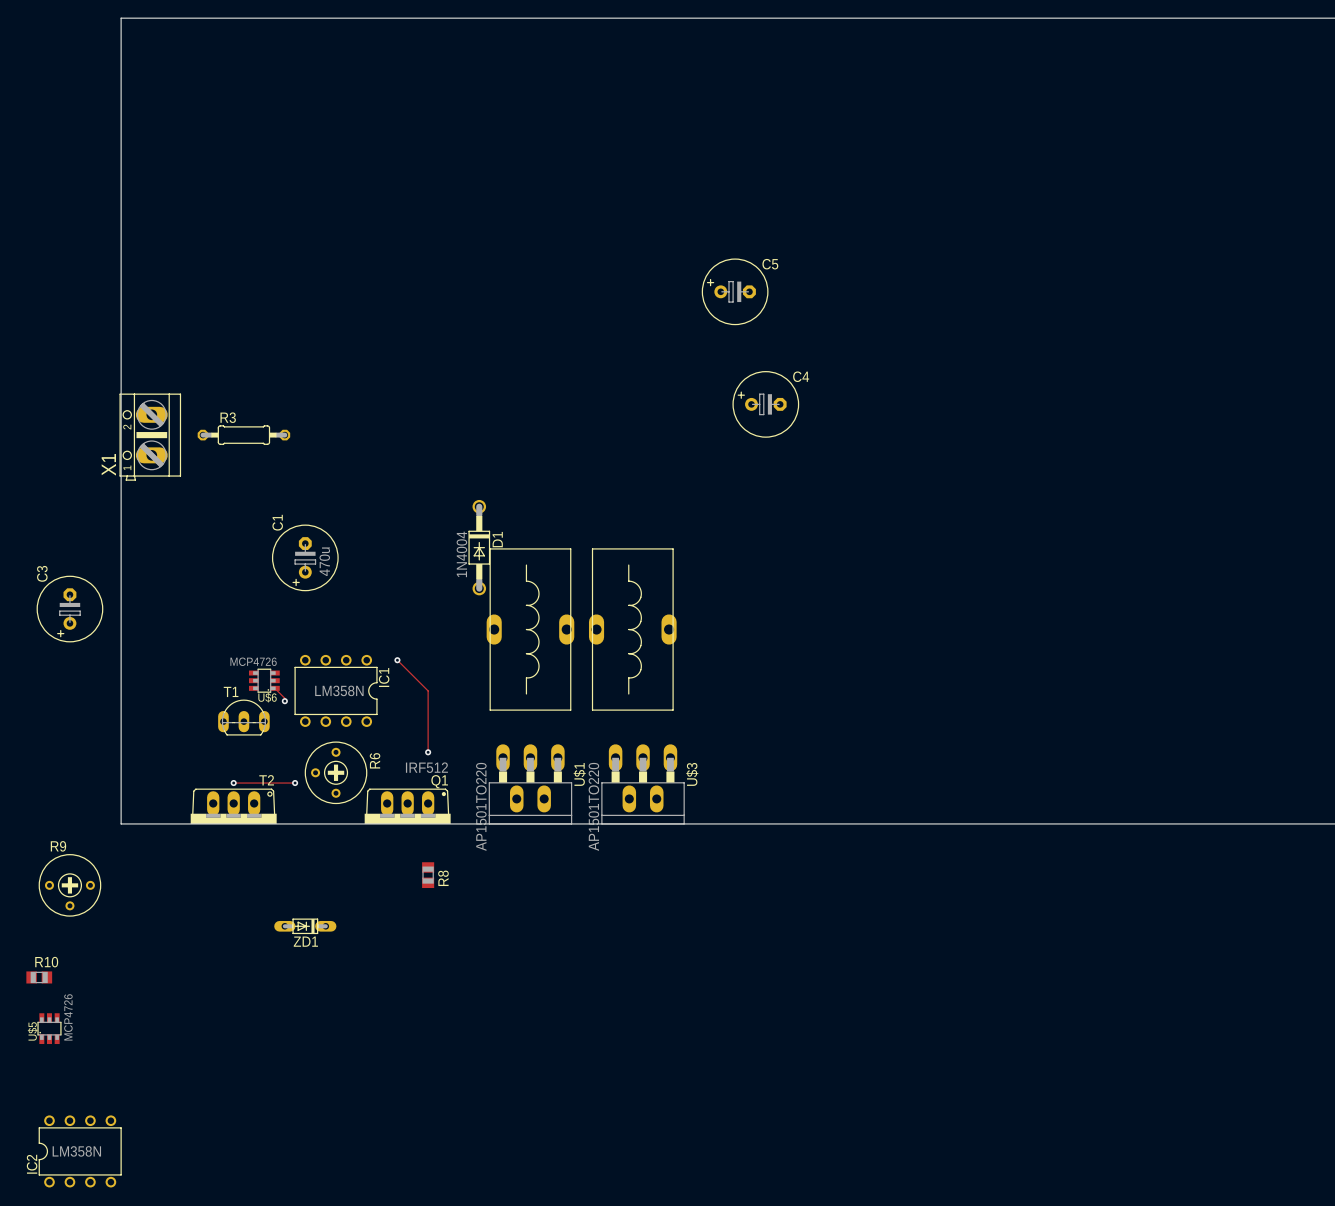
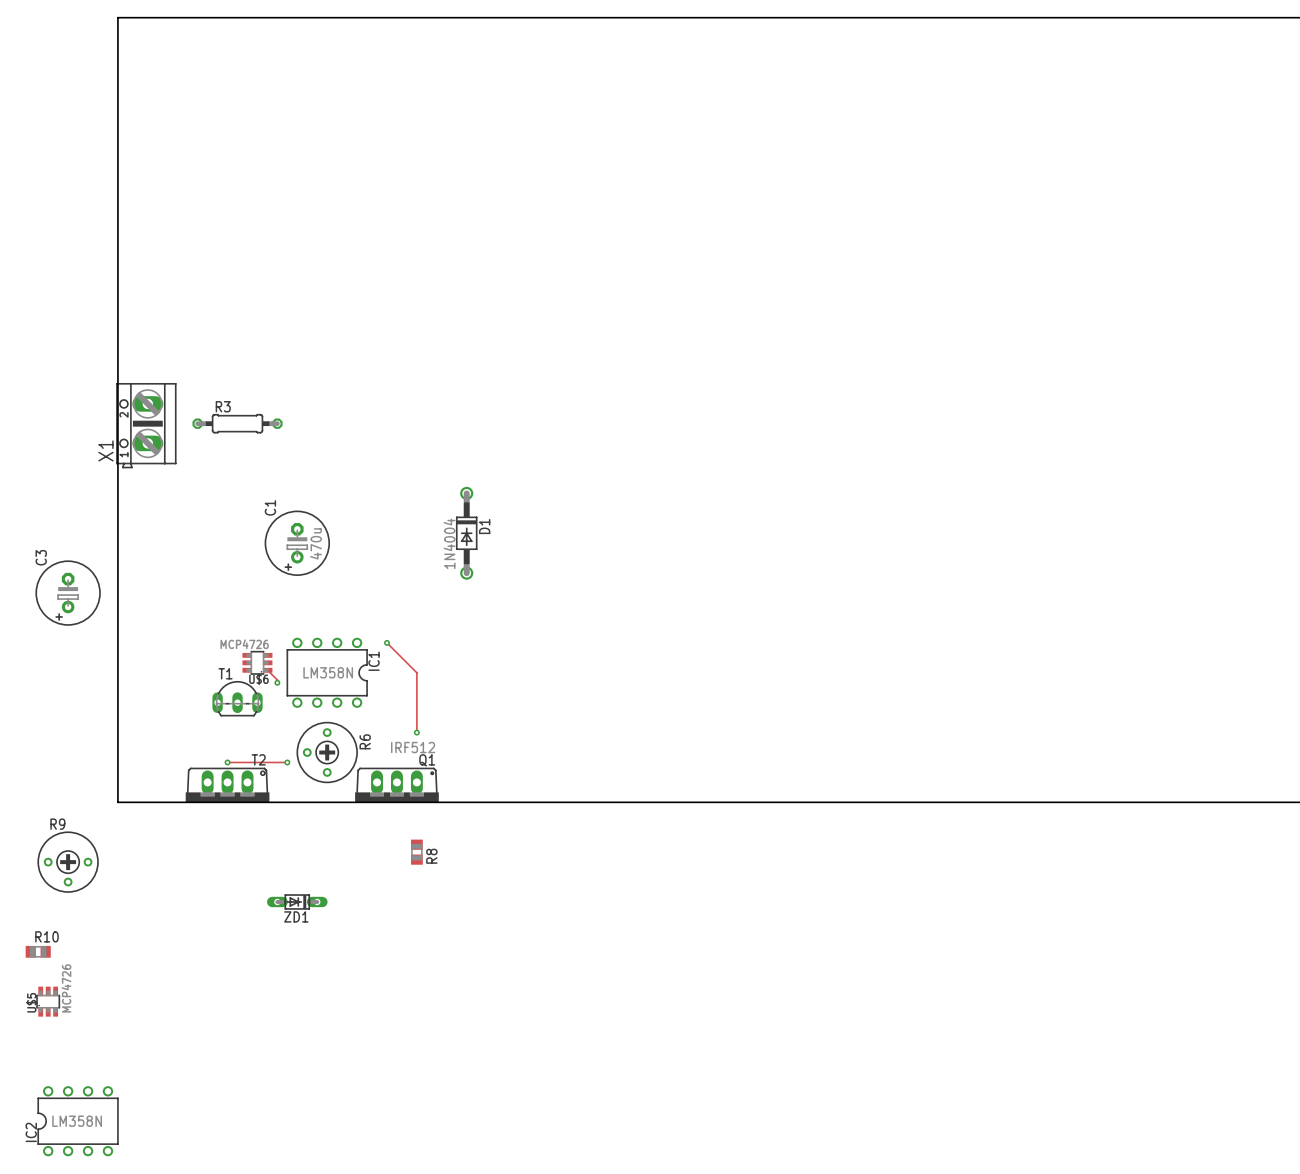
C5: (735, 291) -> none
C4: (765, 404) -> none
part: (530, 629) -> none
part: (632, 629) -> none
U$1: AP1501TO220 (530, 784) -> none
U$3: AP1501TO220 (643, 784) -> none

